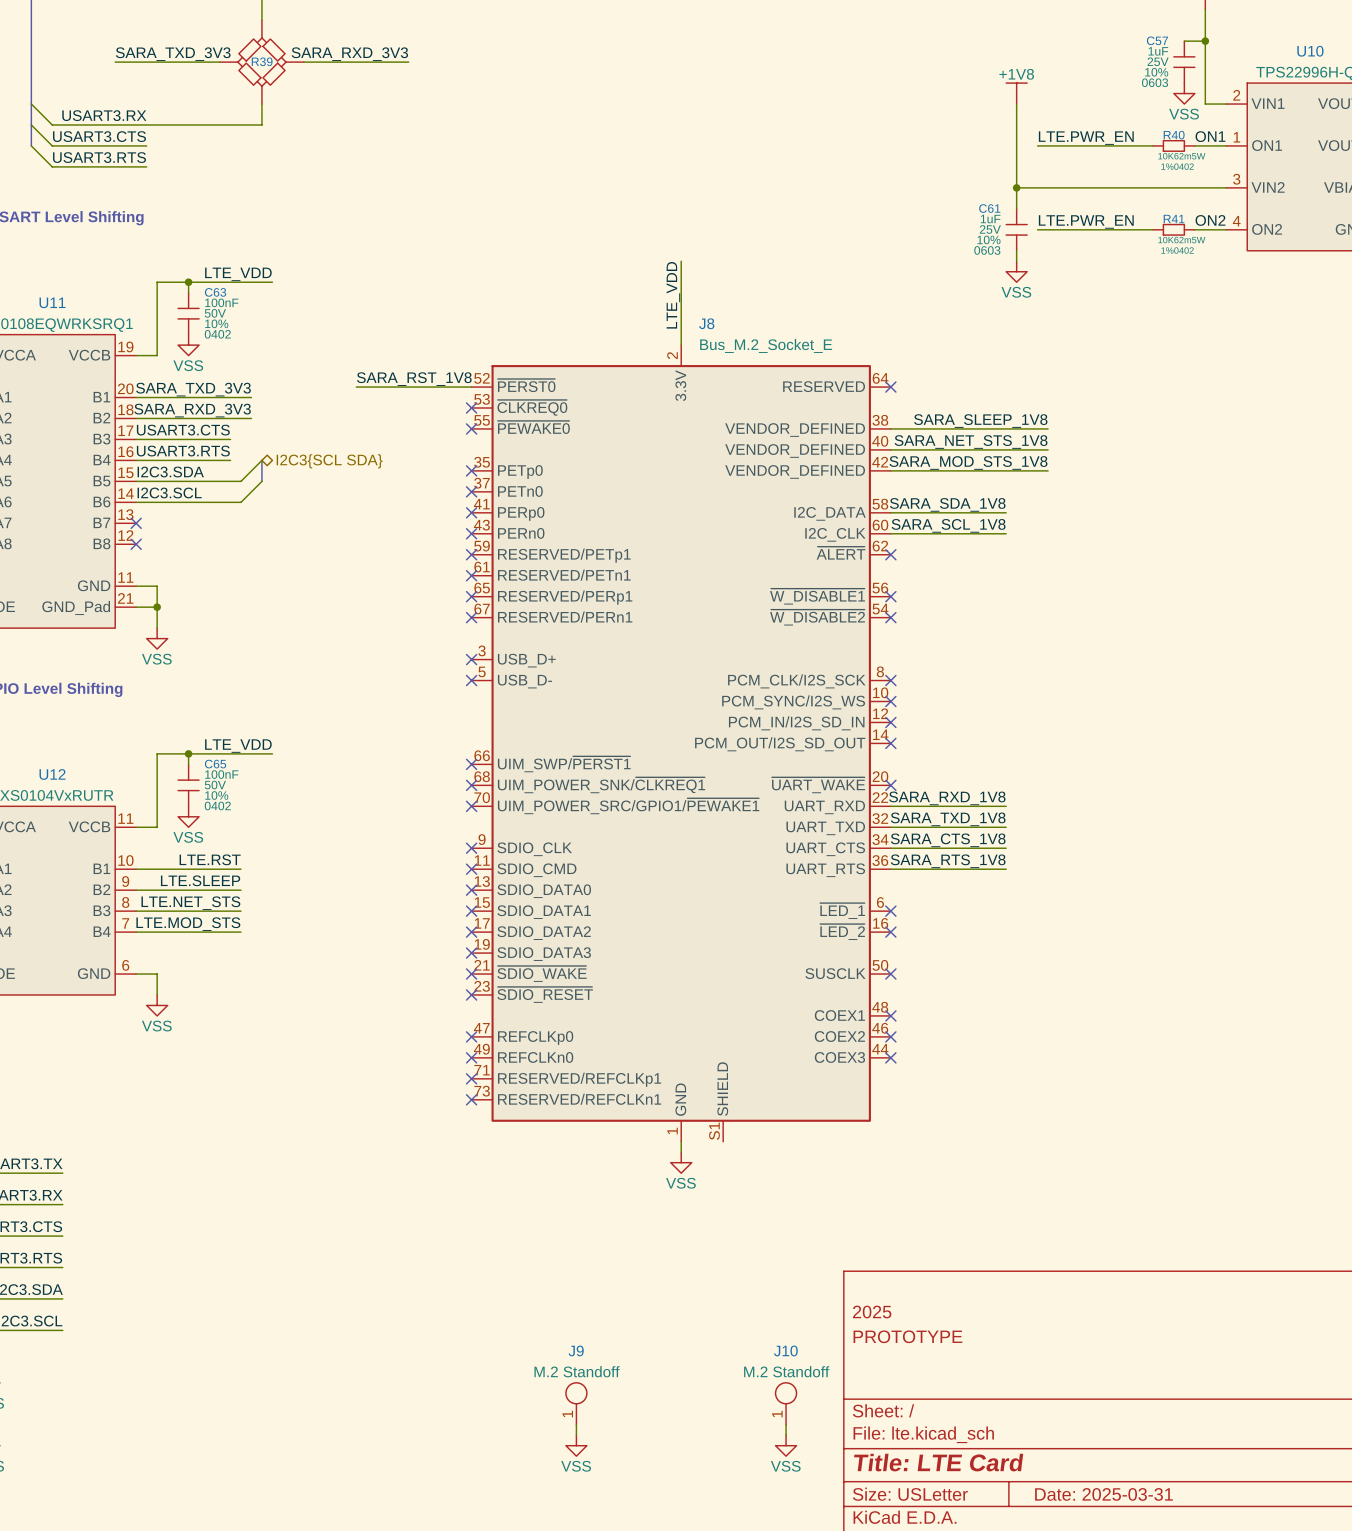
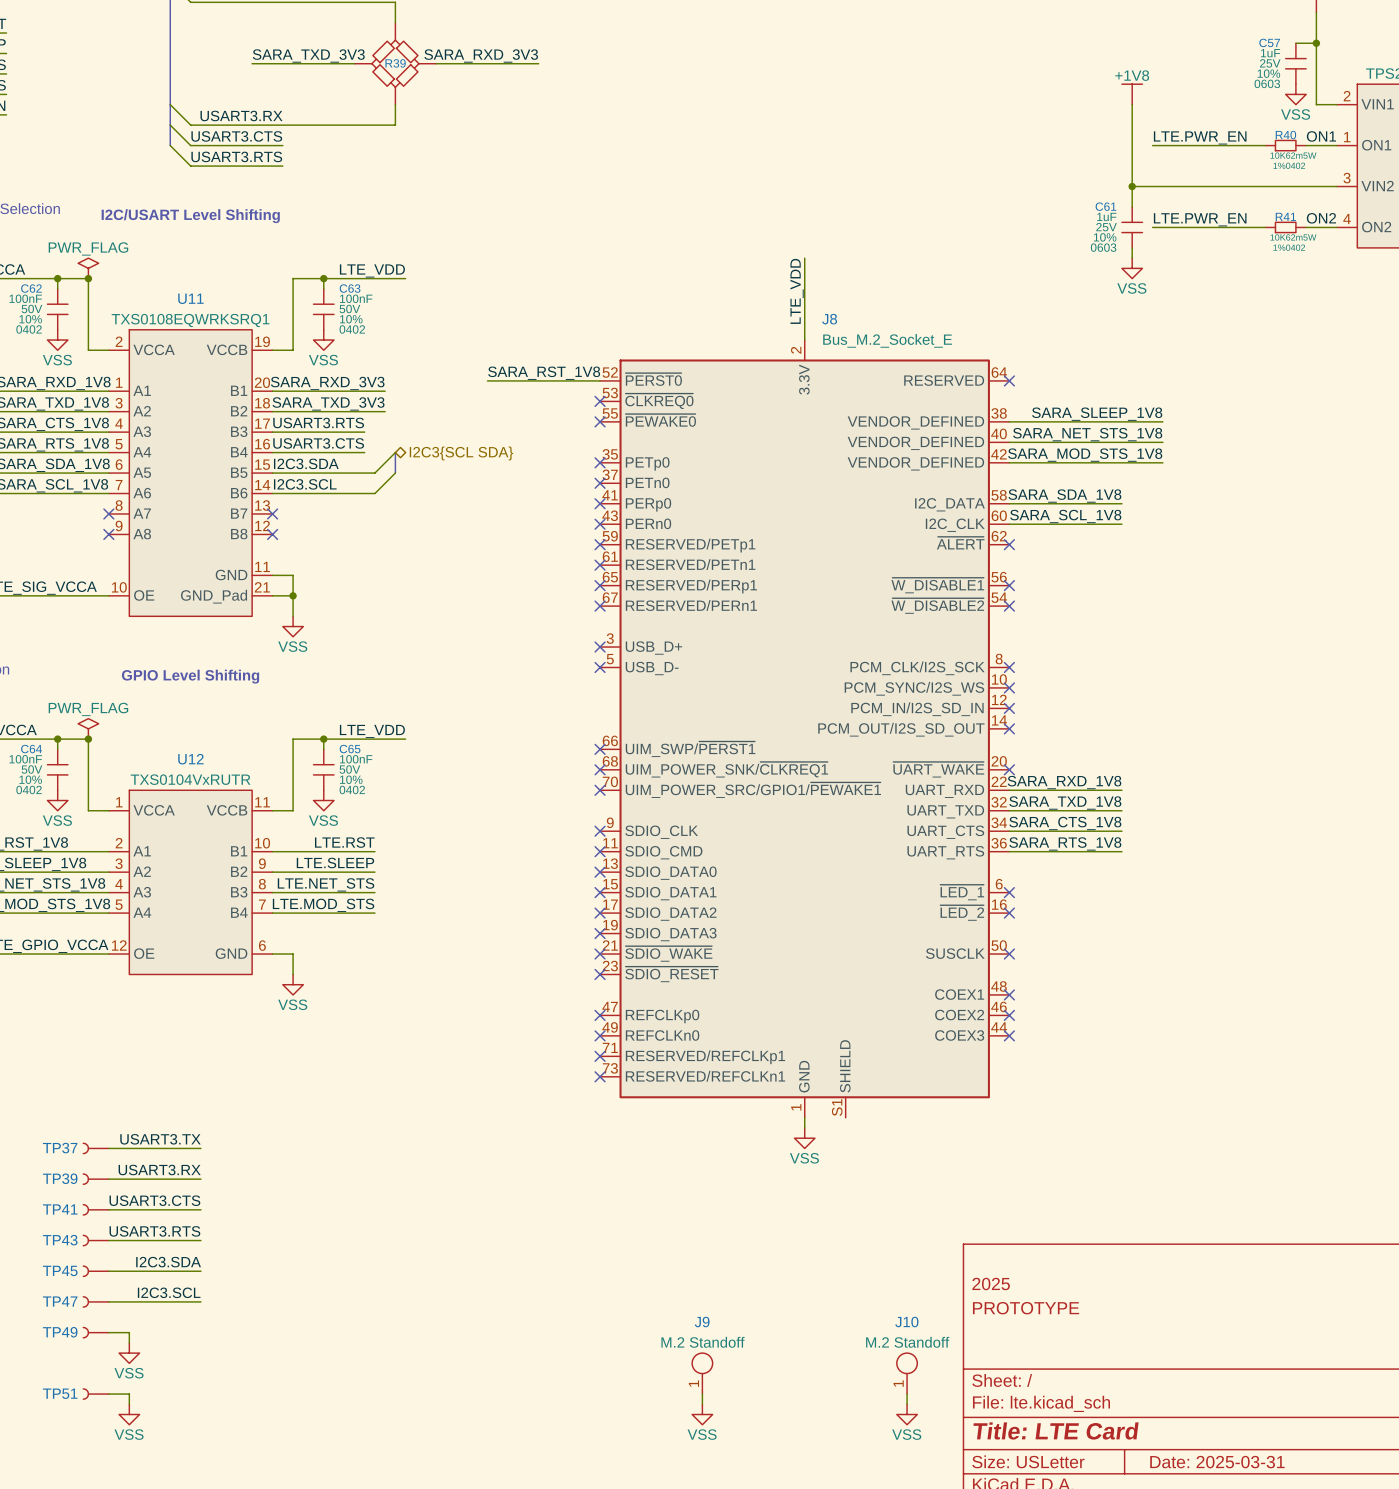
label: SARA_TXD_3V3 (193, 389) -> SARA_RXD_3V3 (327, 383)
label: SARA_RXD_3V3 (192, 410) -> SARA_TXD_3V3 (328, 403)
label: USART3.CTS (183, 430) -> USART3.RTS (318, 422)
label: USART3.RTS (183, 451) -> USART3.CTS (318, 443)

